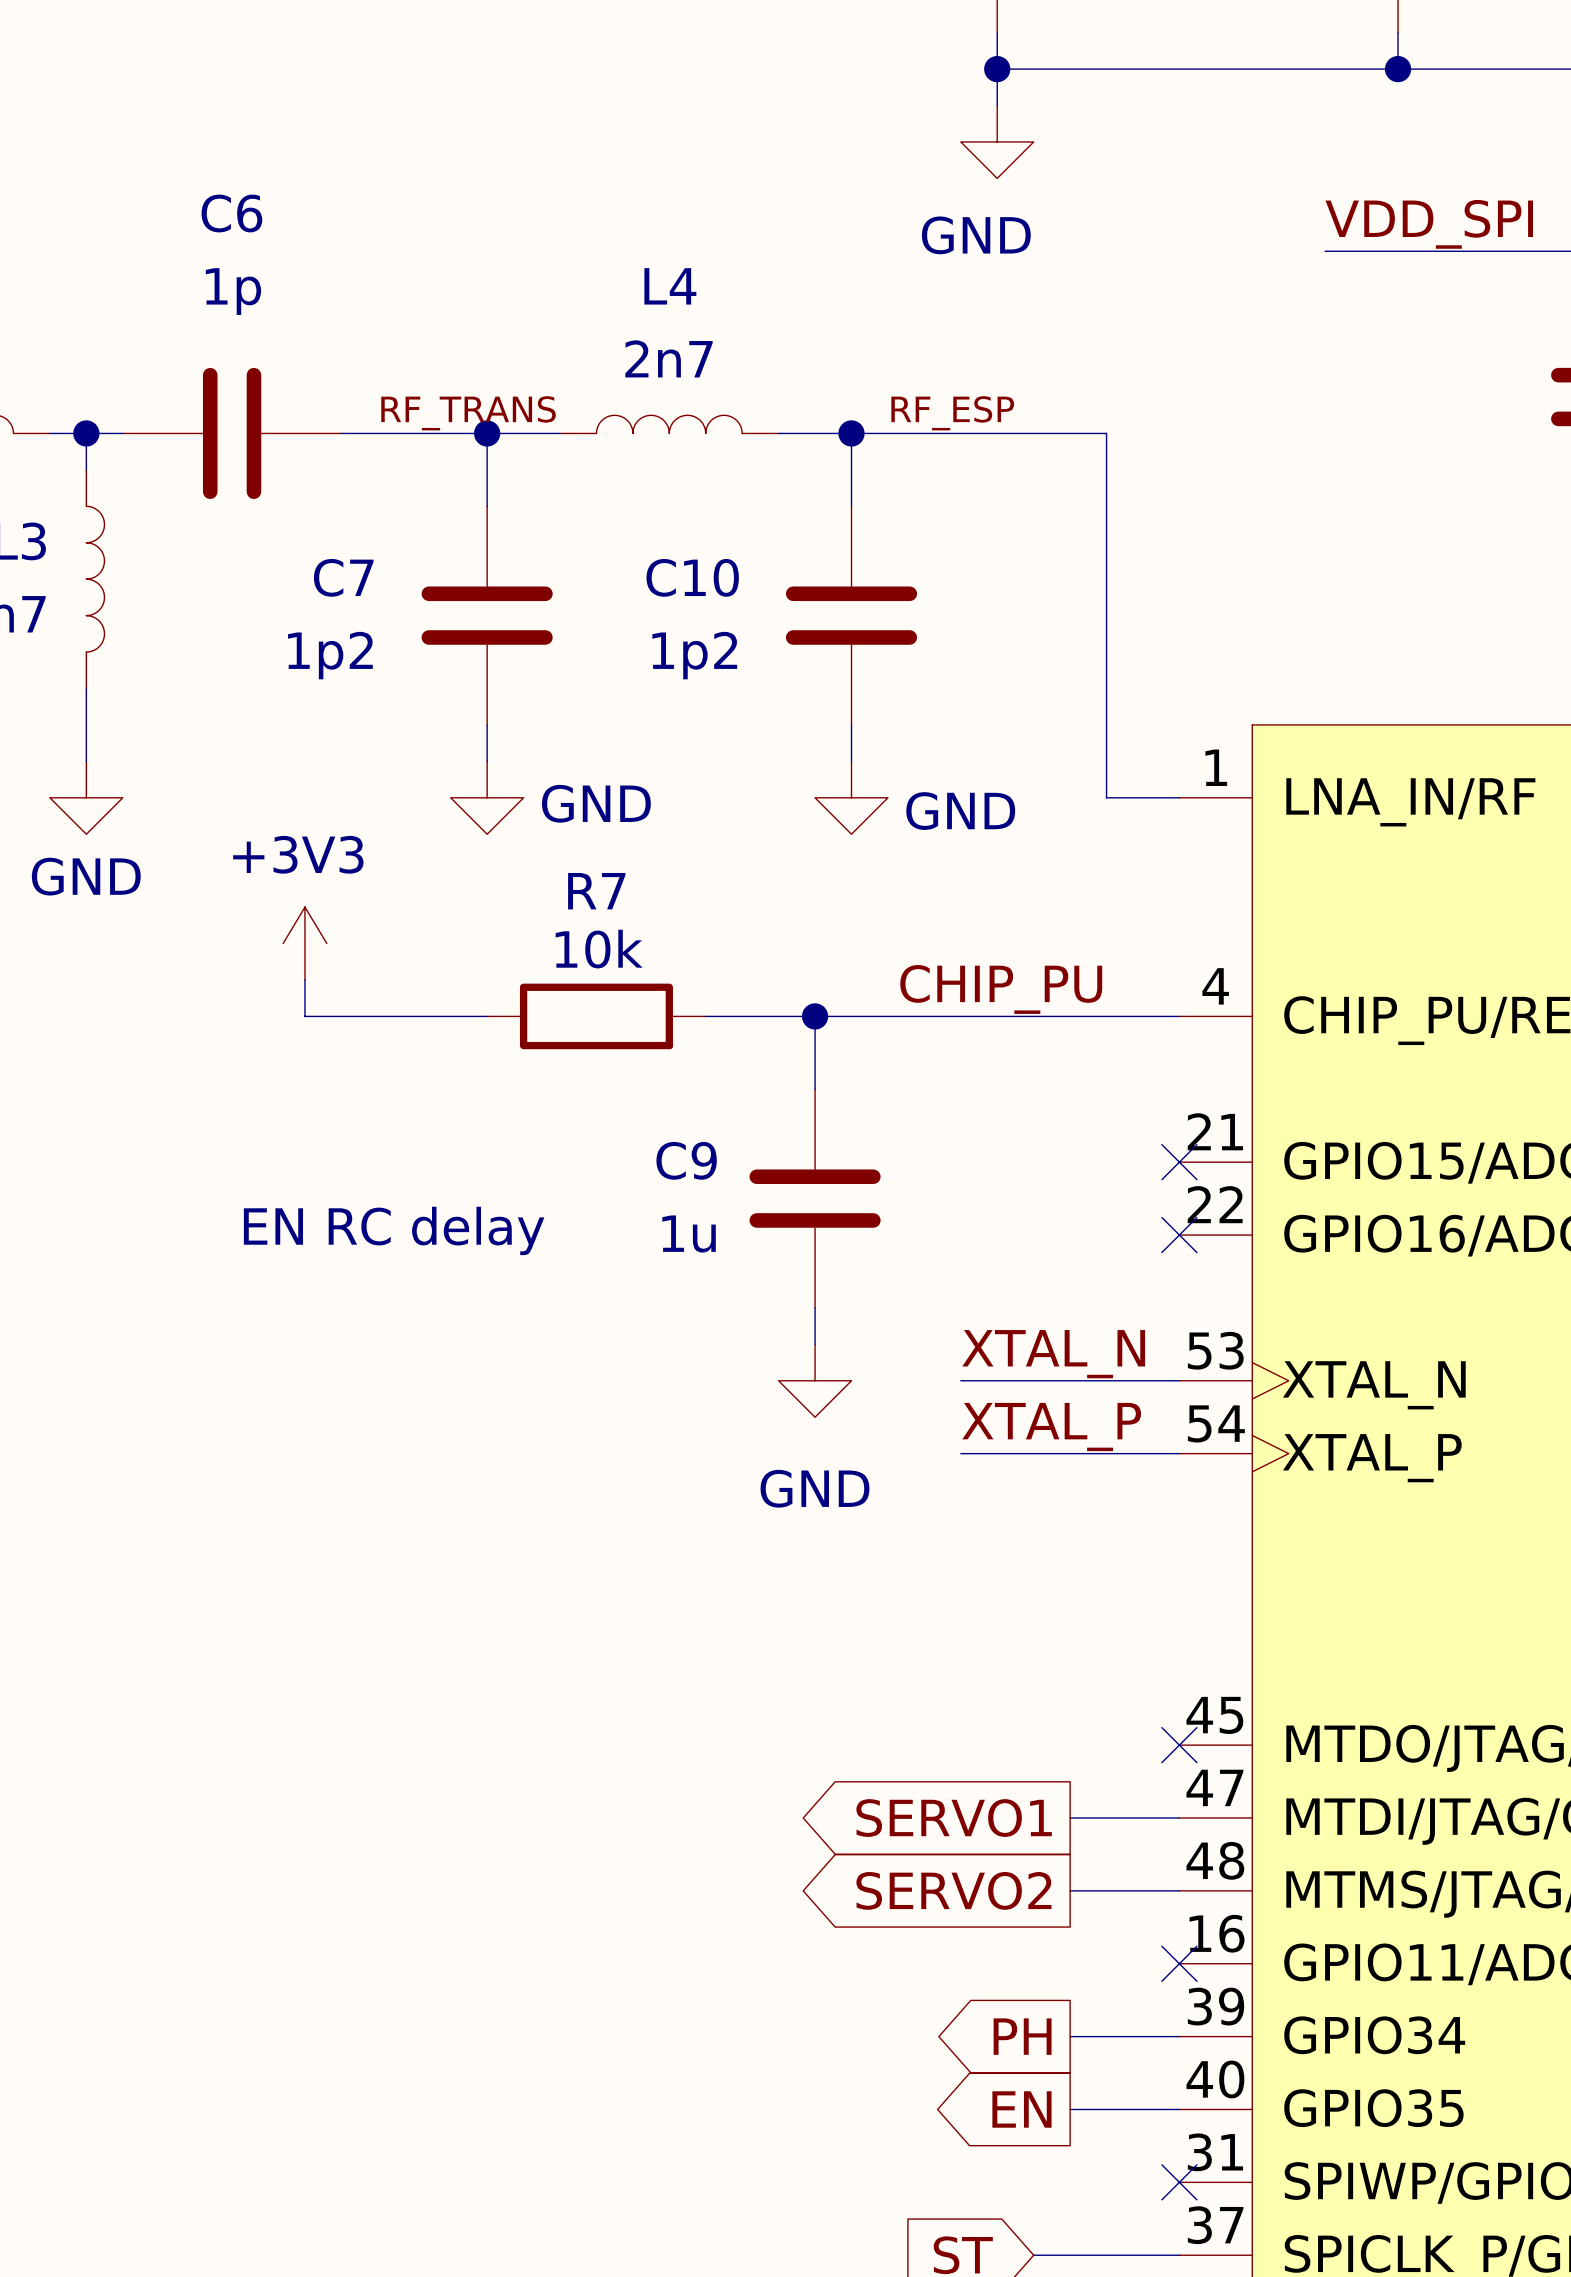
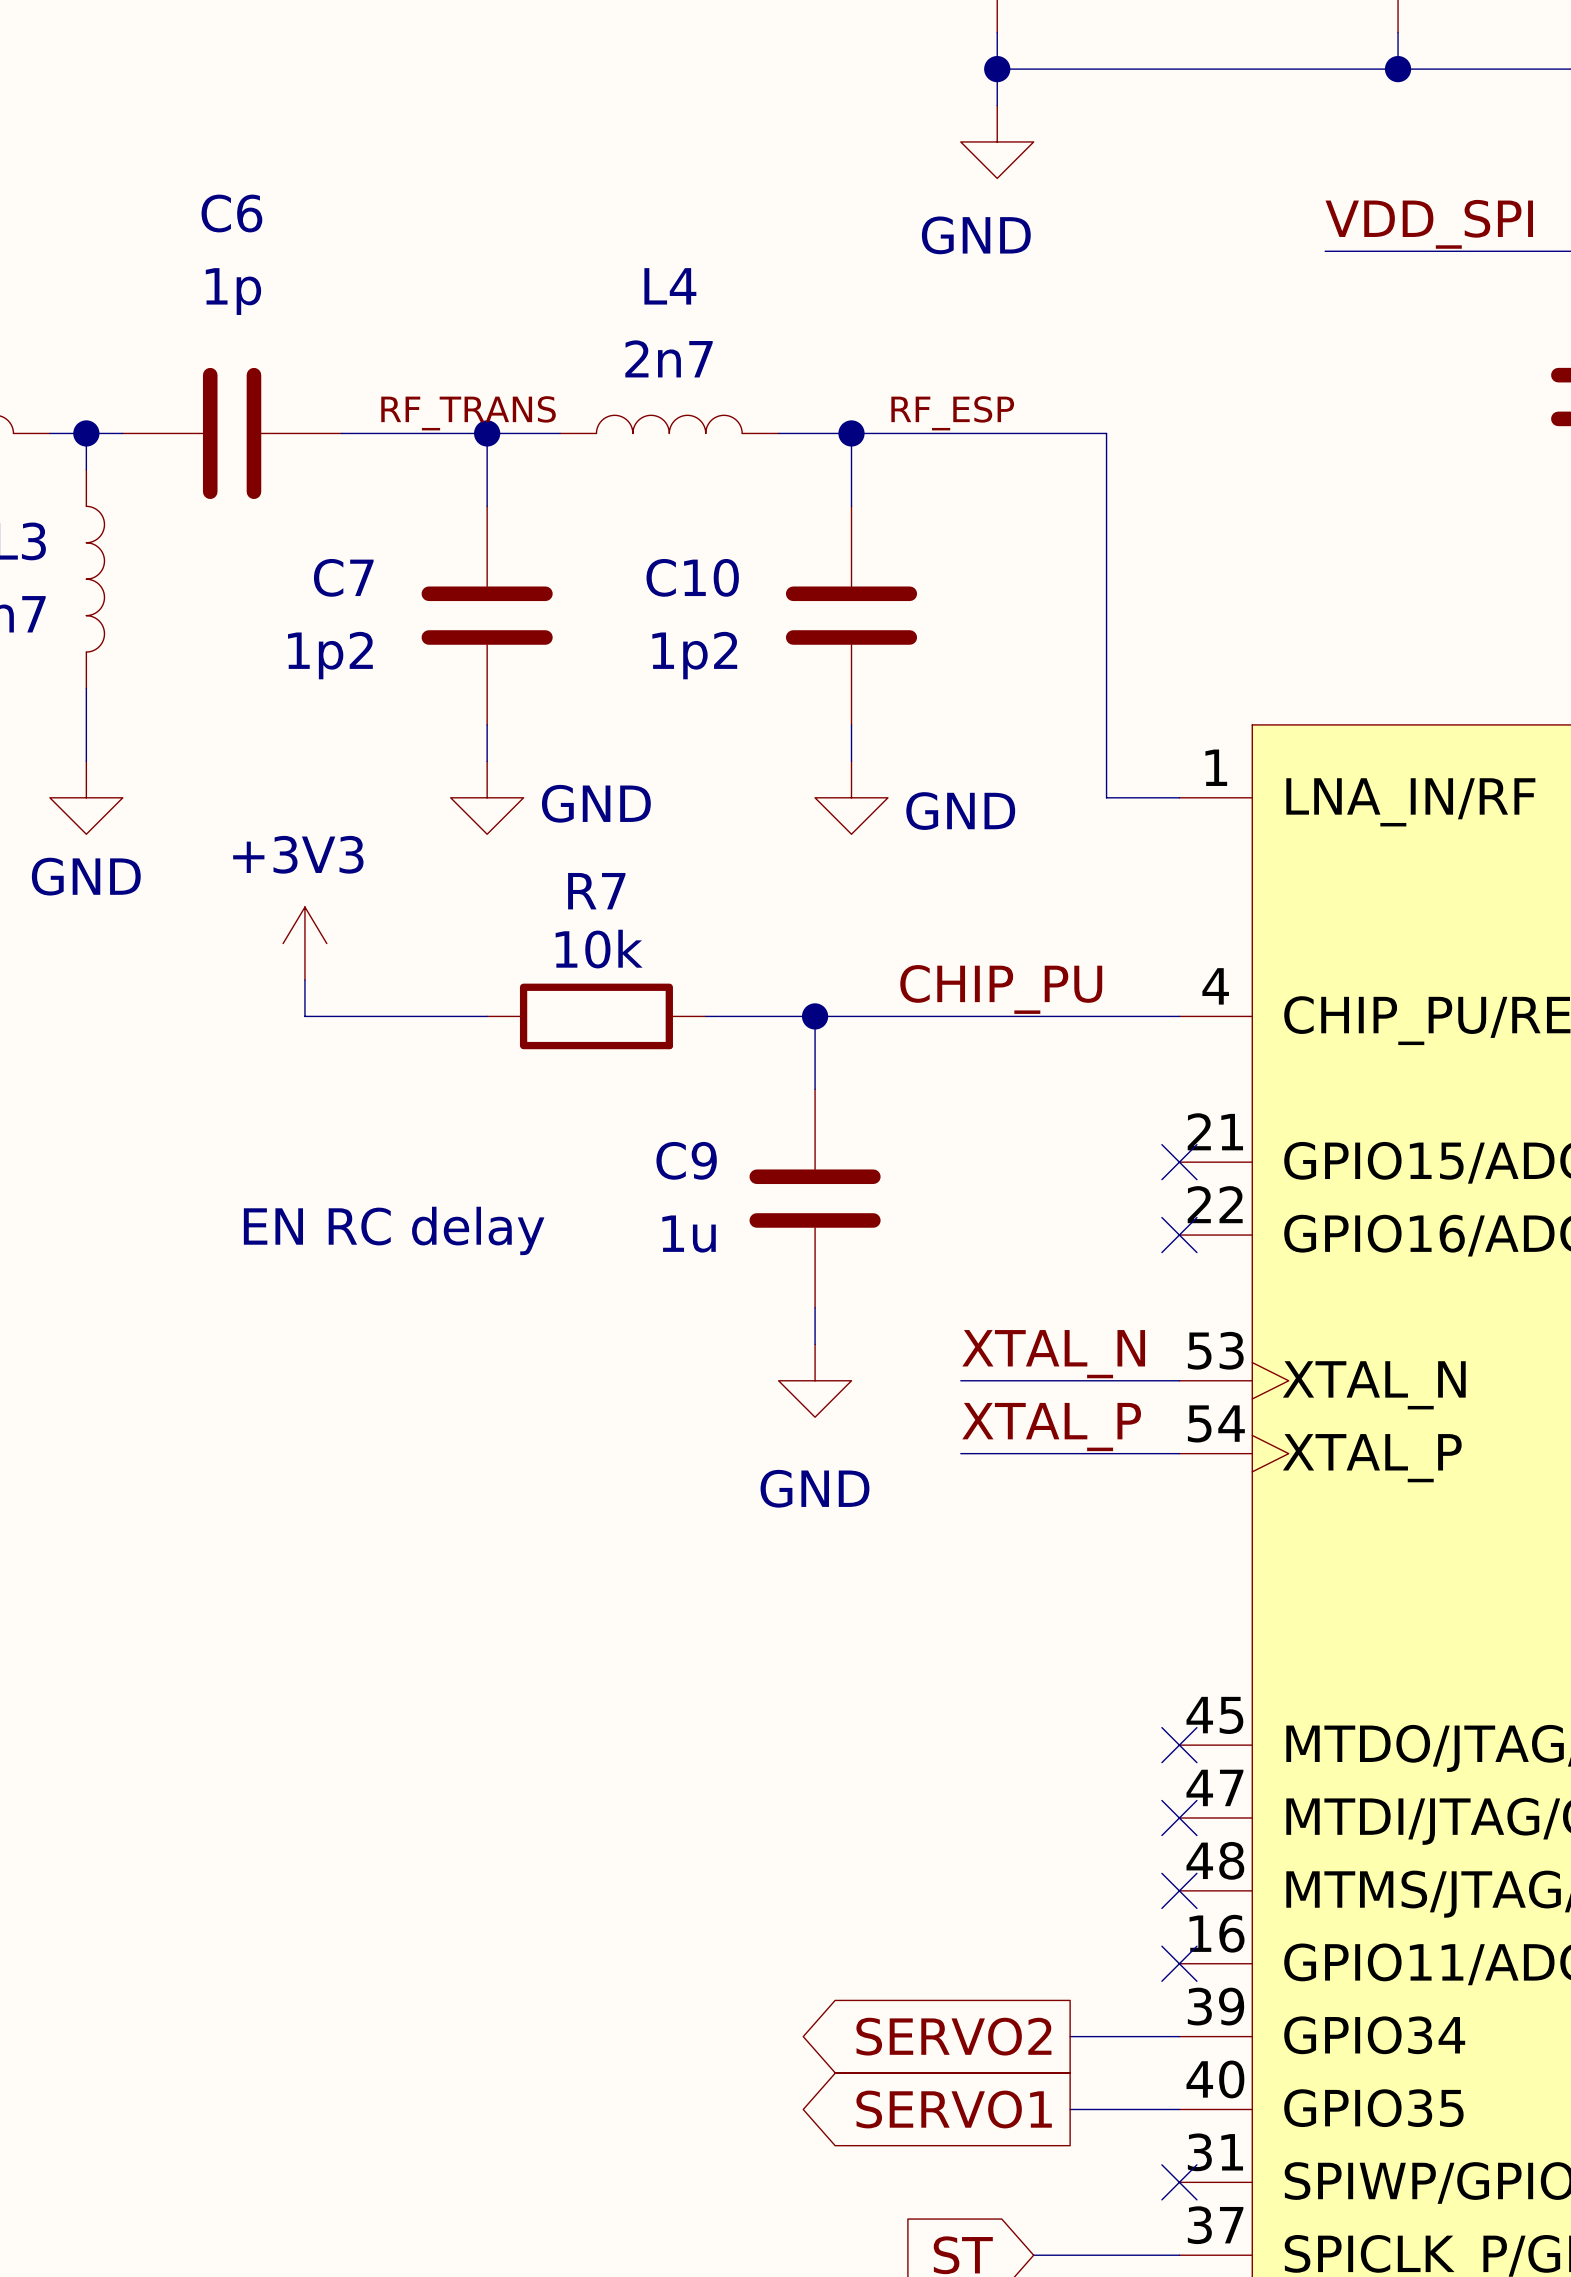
global label: SERVO1 (954, 1818) -> none
wire: (1070, 1818) (1179, 1818) -> none
no-connect mark: none -> (1179, 1818)
global label: SERVO2 (953, 1890) -> none
wire: (1070, 1890) (1179, 1890) -> none
no-connect mark: none -> (1179, 1890)
global label: PH (1022, 2036) -> SERVO2 (953, 2036)
global label: EN (1021, 2109) -> SERVO1 (954, 2109)

